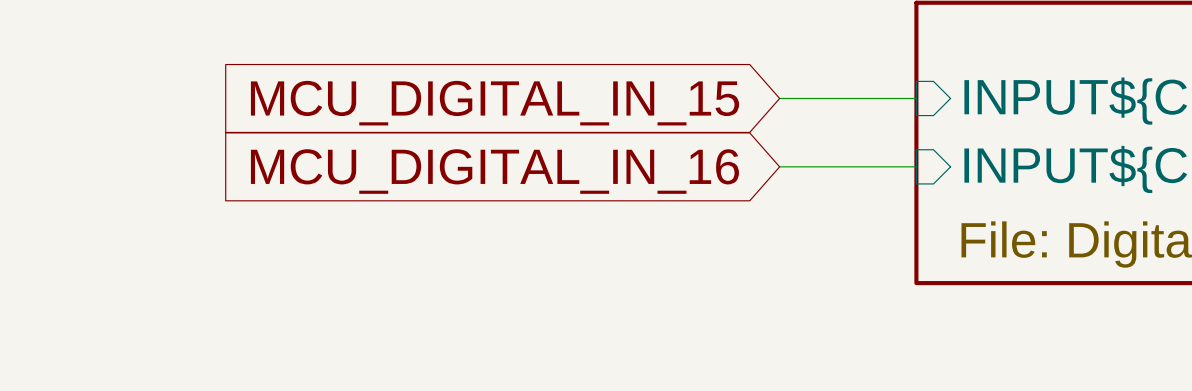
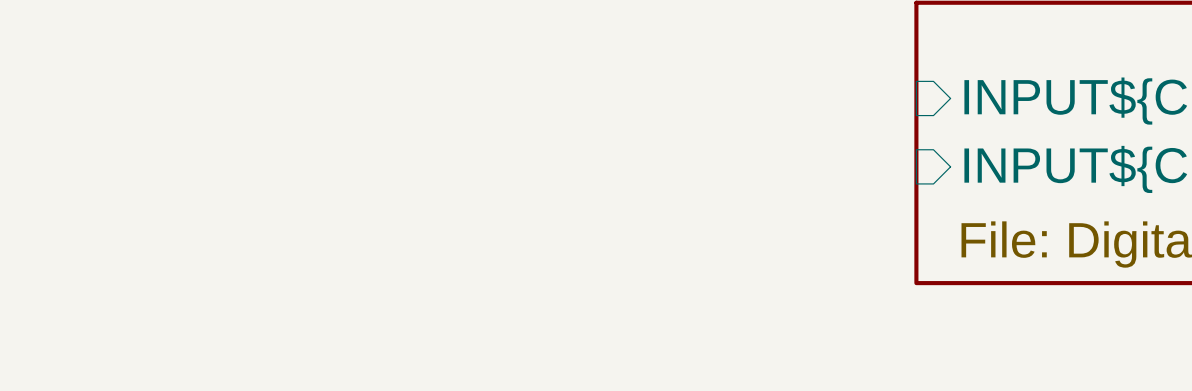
wire: (779, 98) (916, 98) -> none
global label: MCU_DIGITAL_IN_15 (495, 103) -> none
wire: (779, 166) (916, 166) -> none
global label: MCU_DIGITAL_IN_16 (494, 171) -> none

